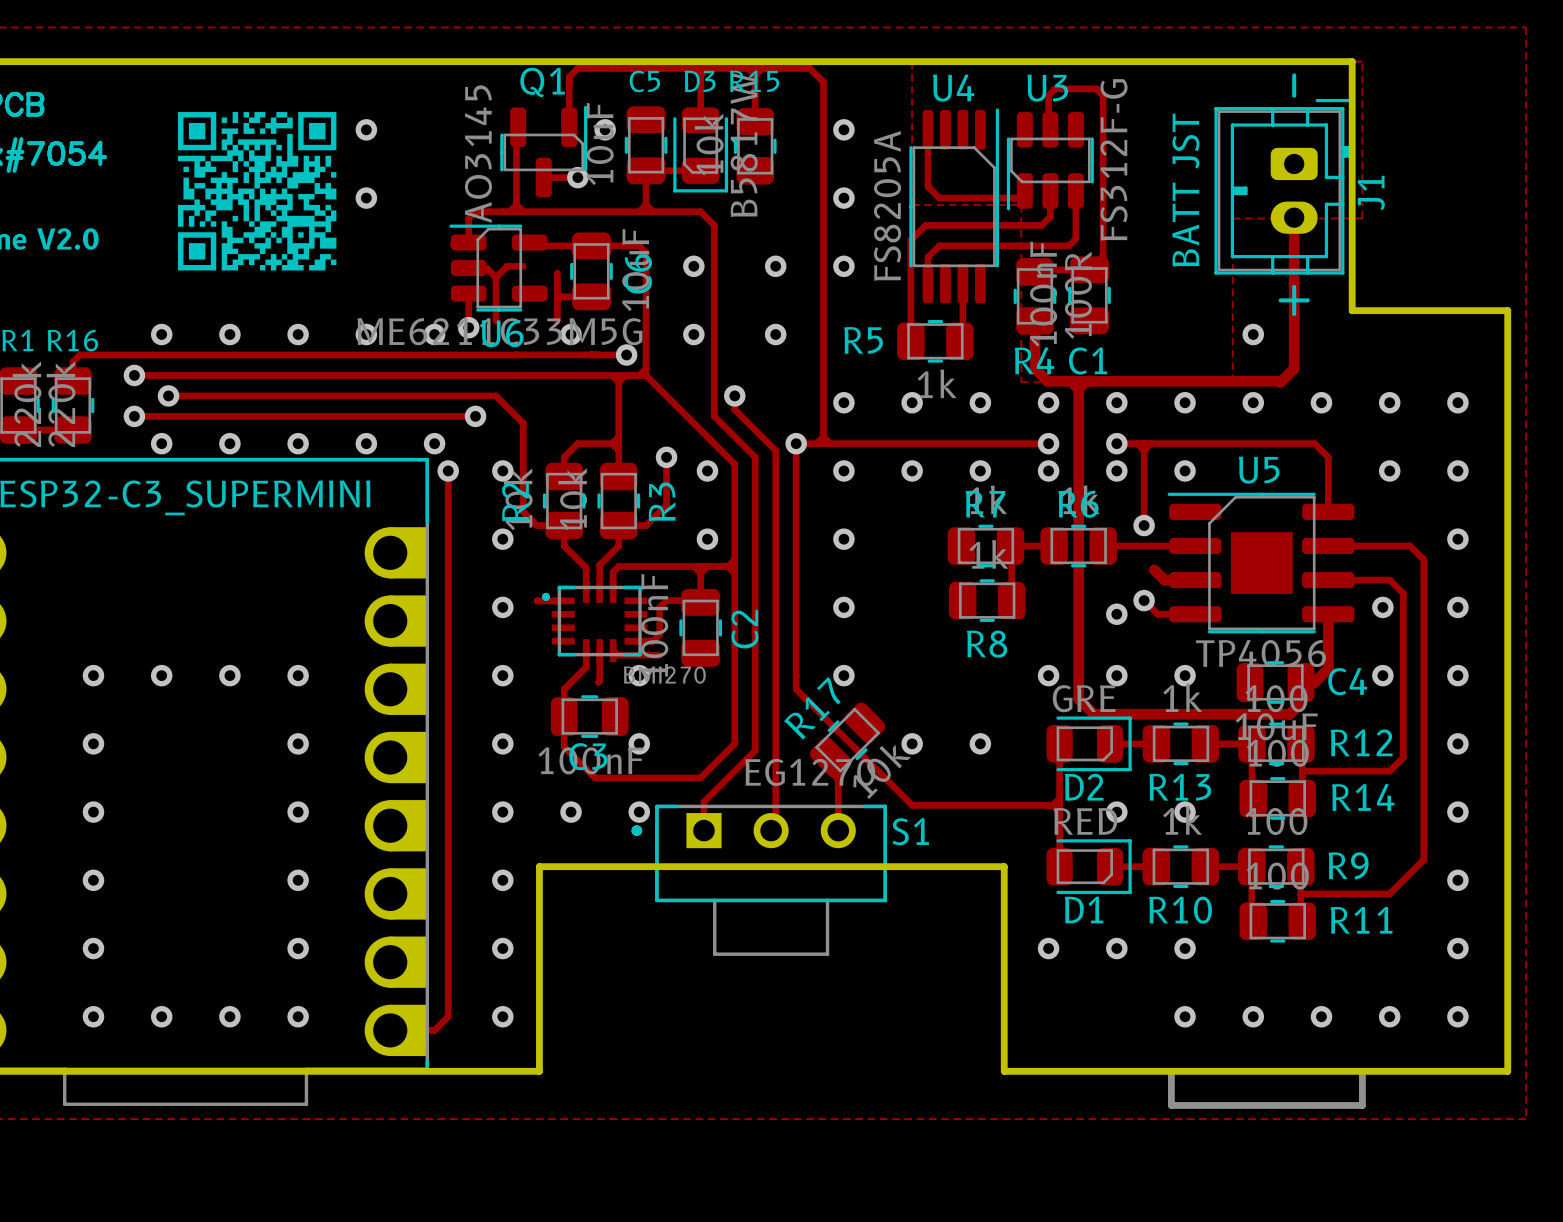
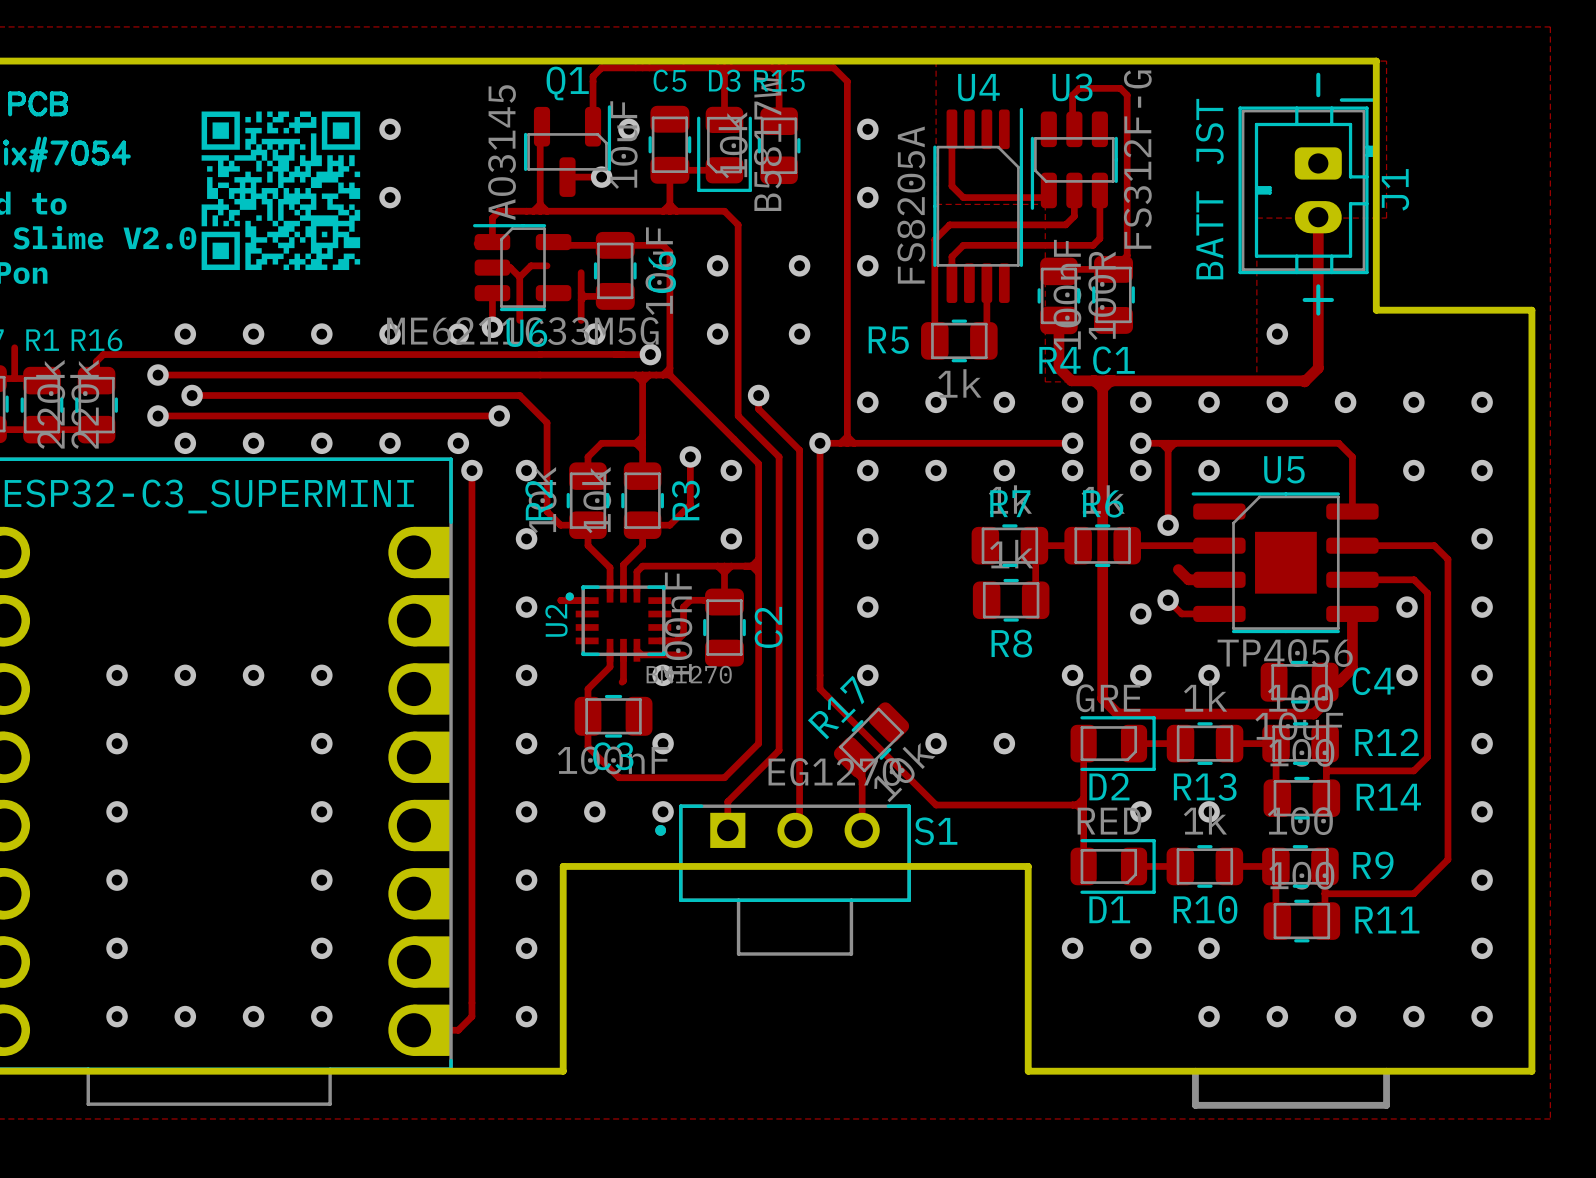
U2 name: none -> U2 (556, 620)

